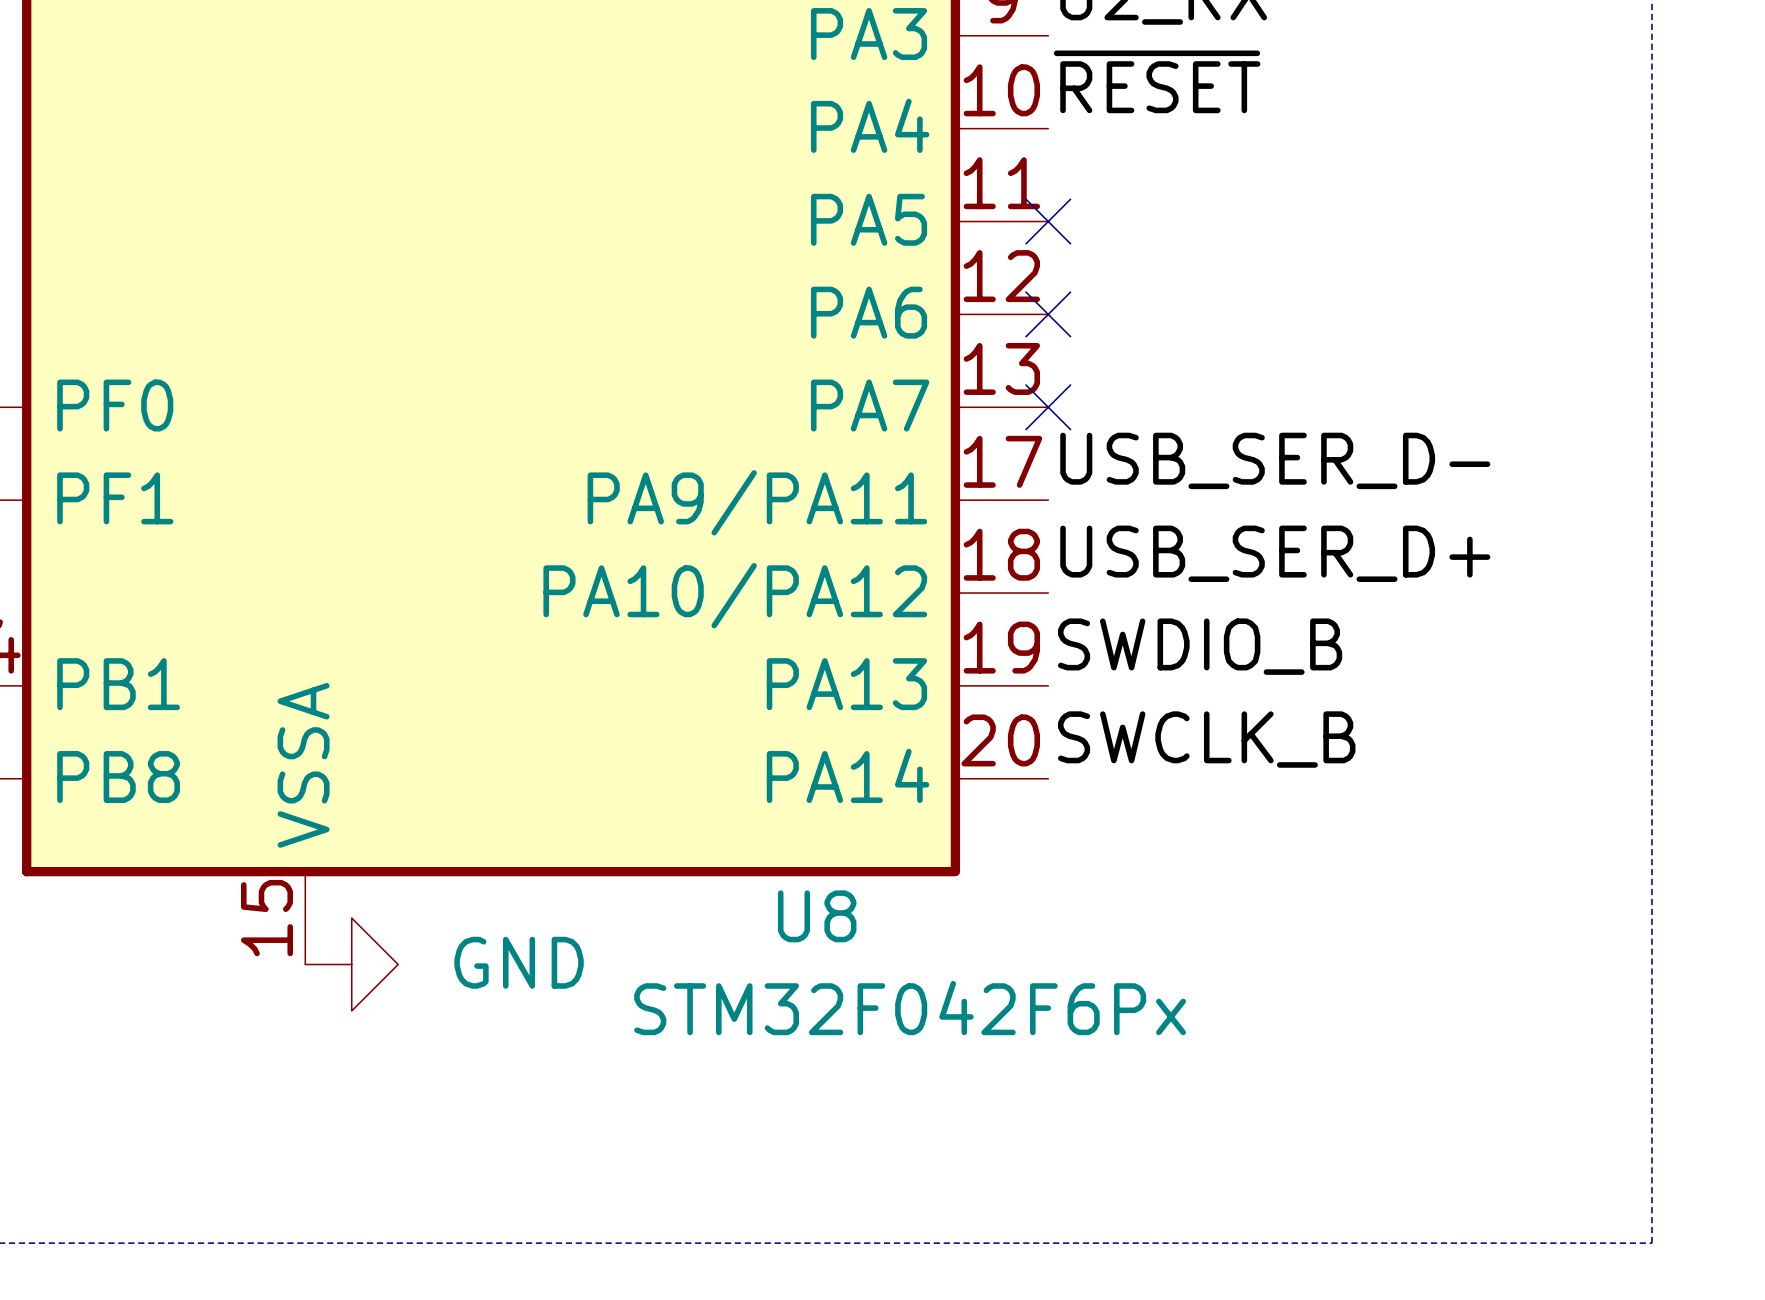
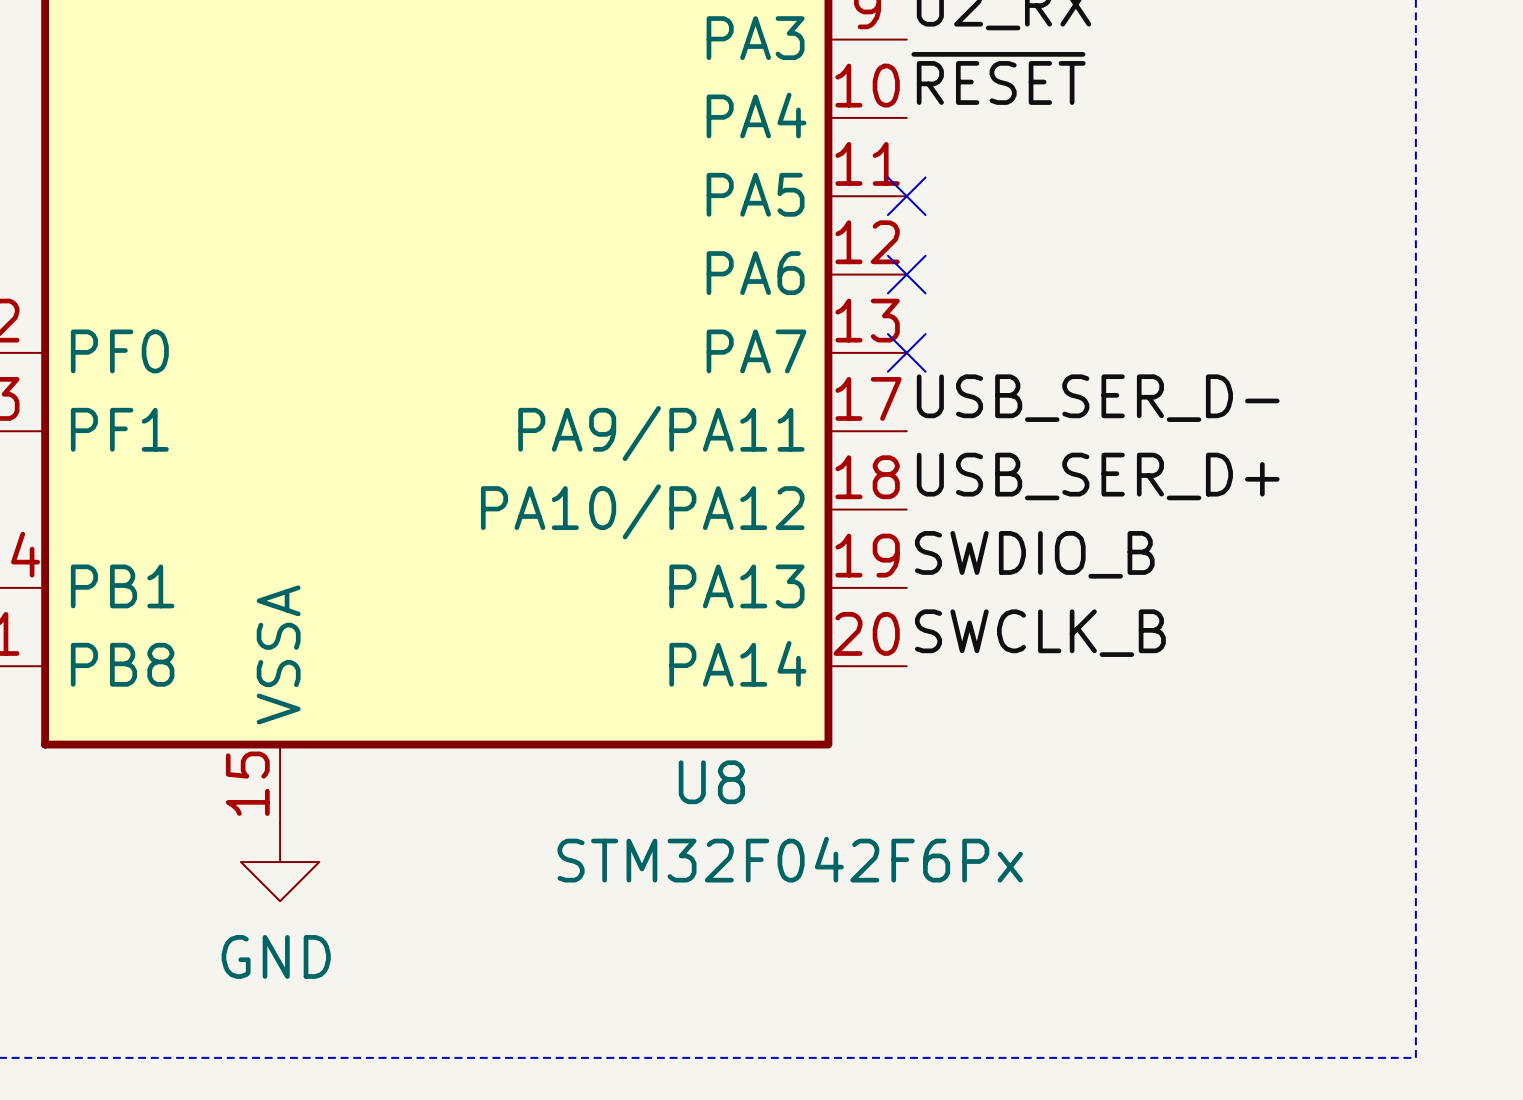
power symbol rotation: 0° (351, 964) -> 90° clockwise (280, 862)
power symbol position: GND (351, 964) -> GND (280, 862)

